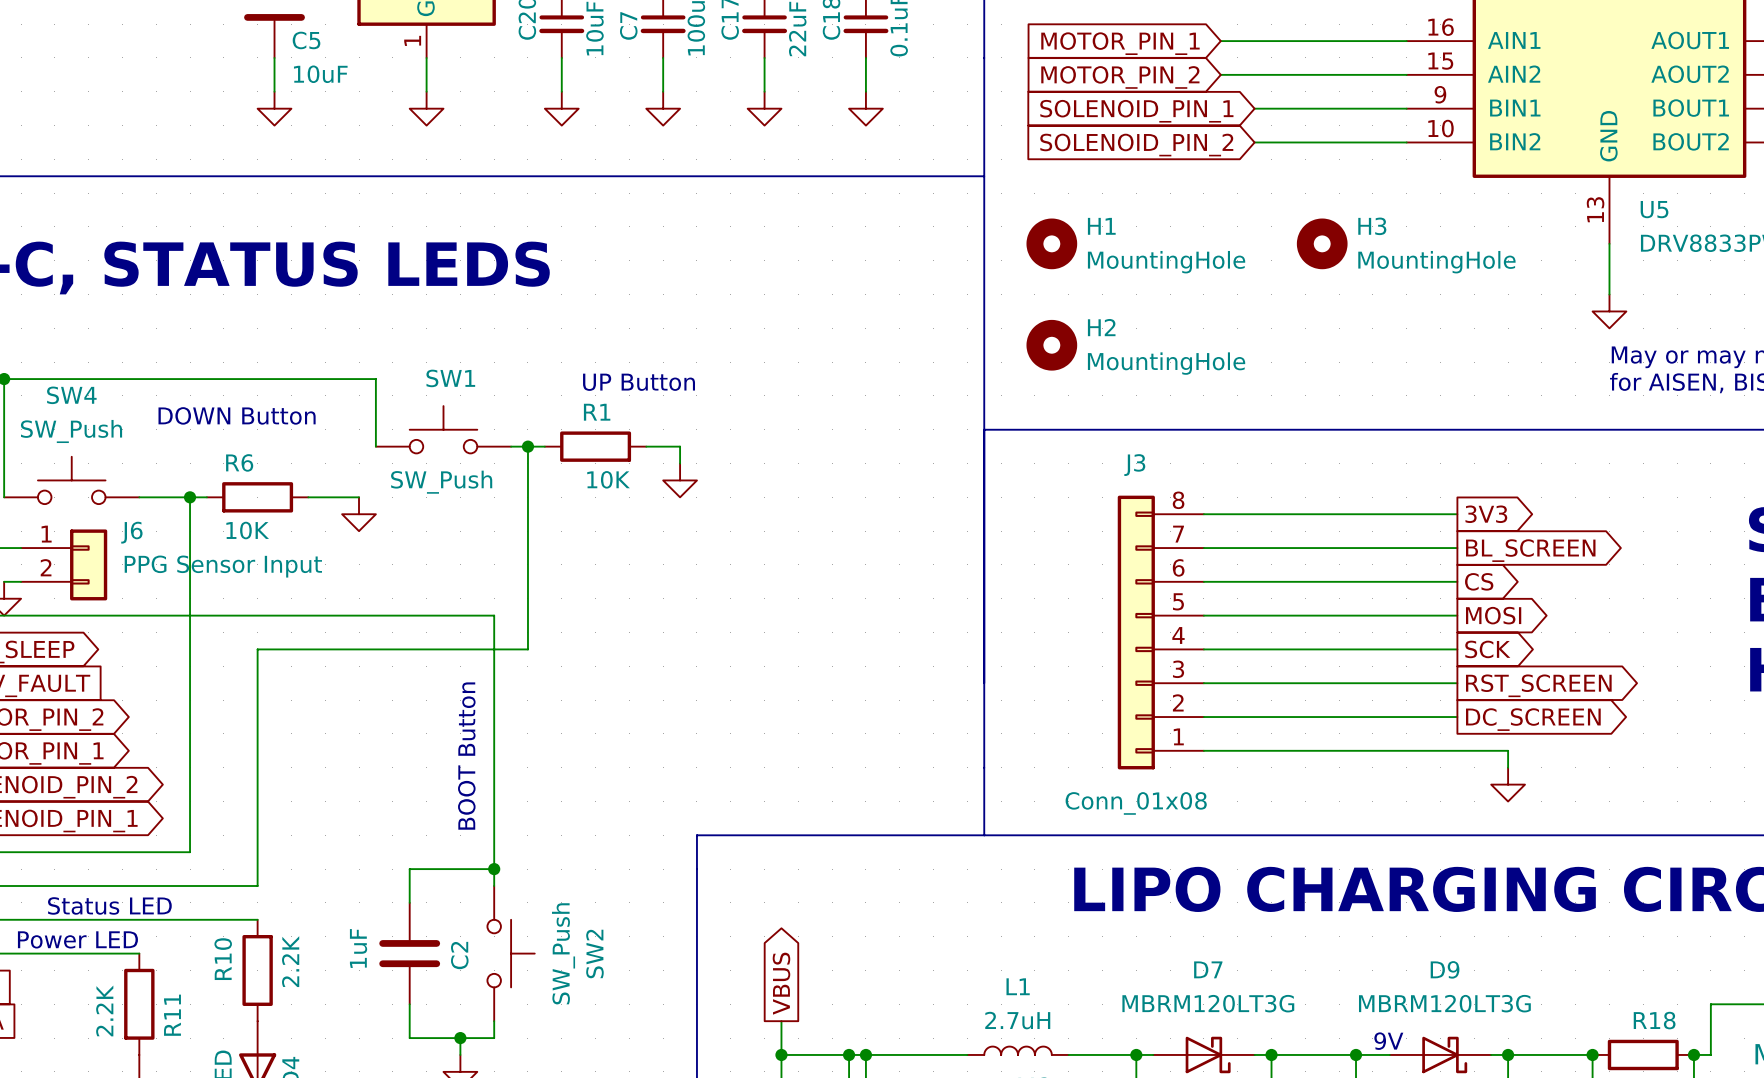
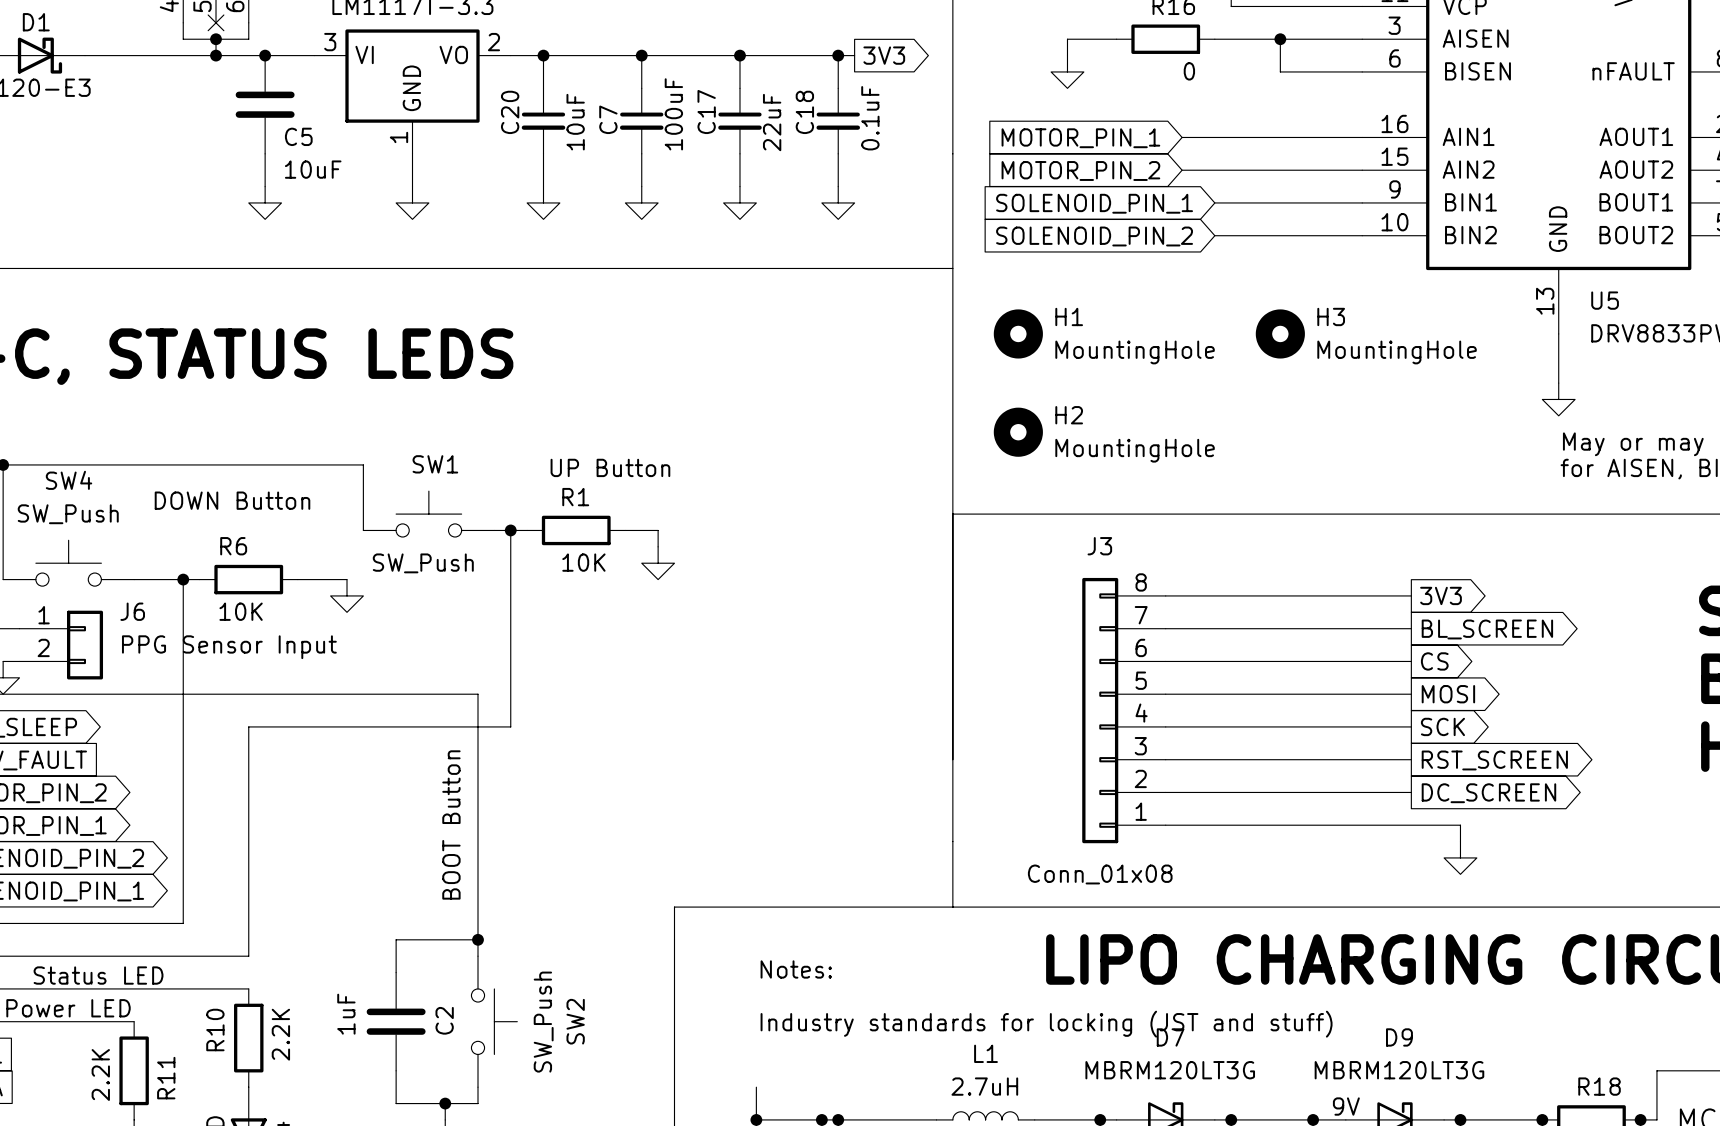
text: none -> Notes: (796, 969)
text: none -> Industry standards for locking (JST and stuff) (1046, 1024)
global label: VBUS (781, 983) -> none

